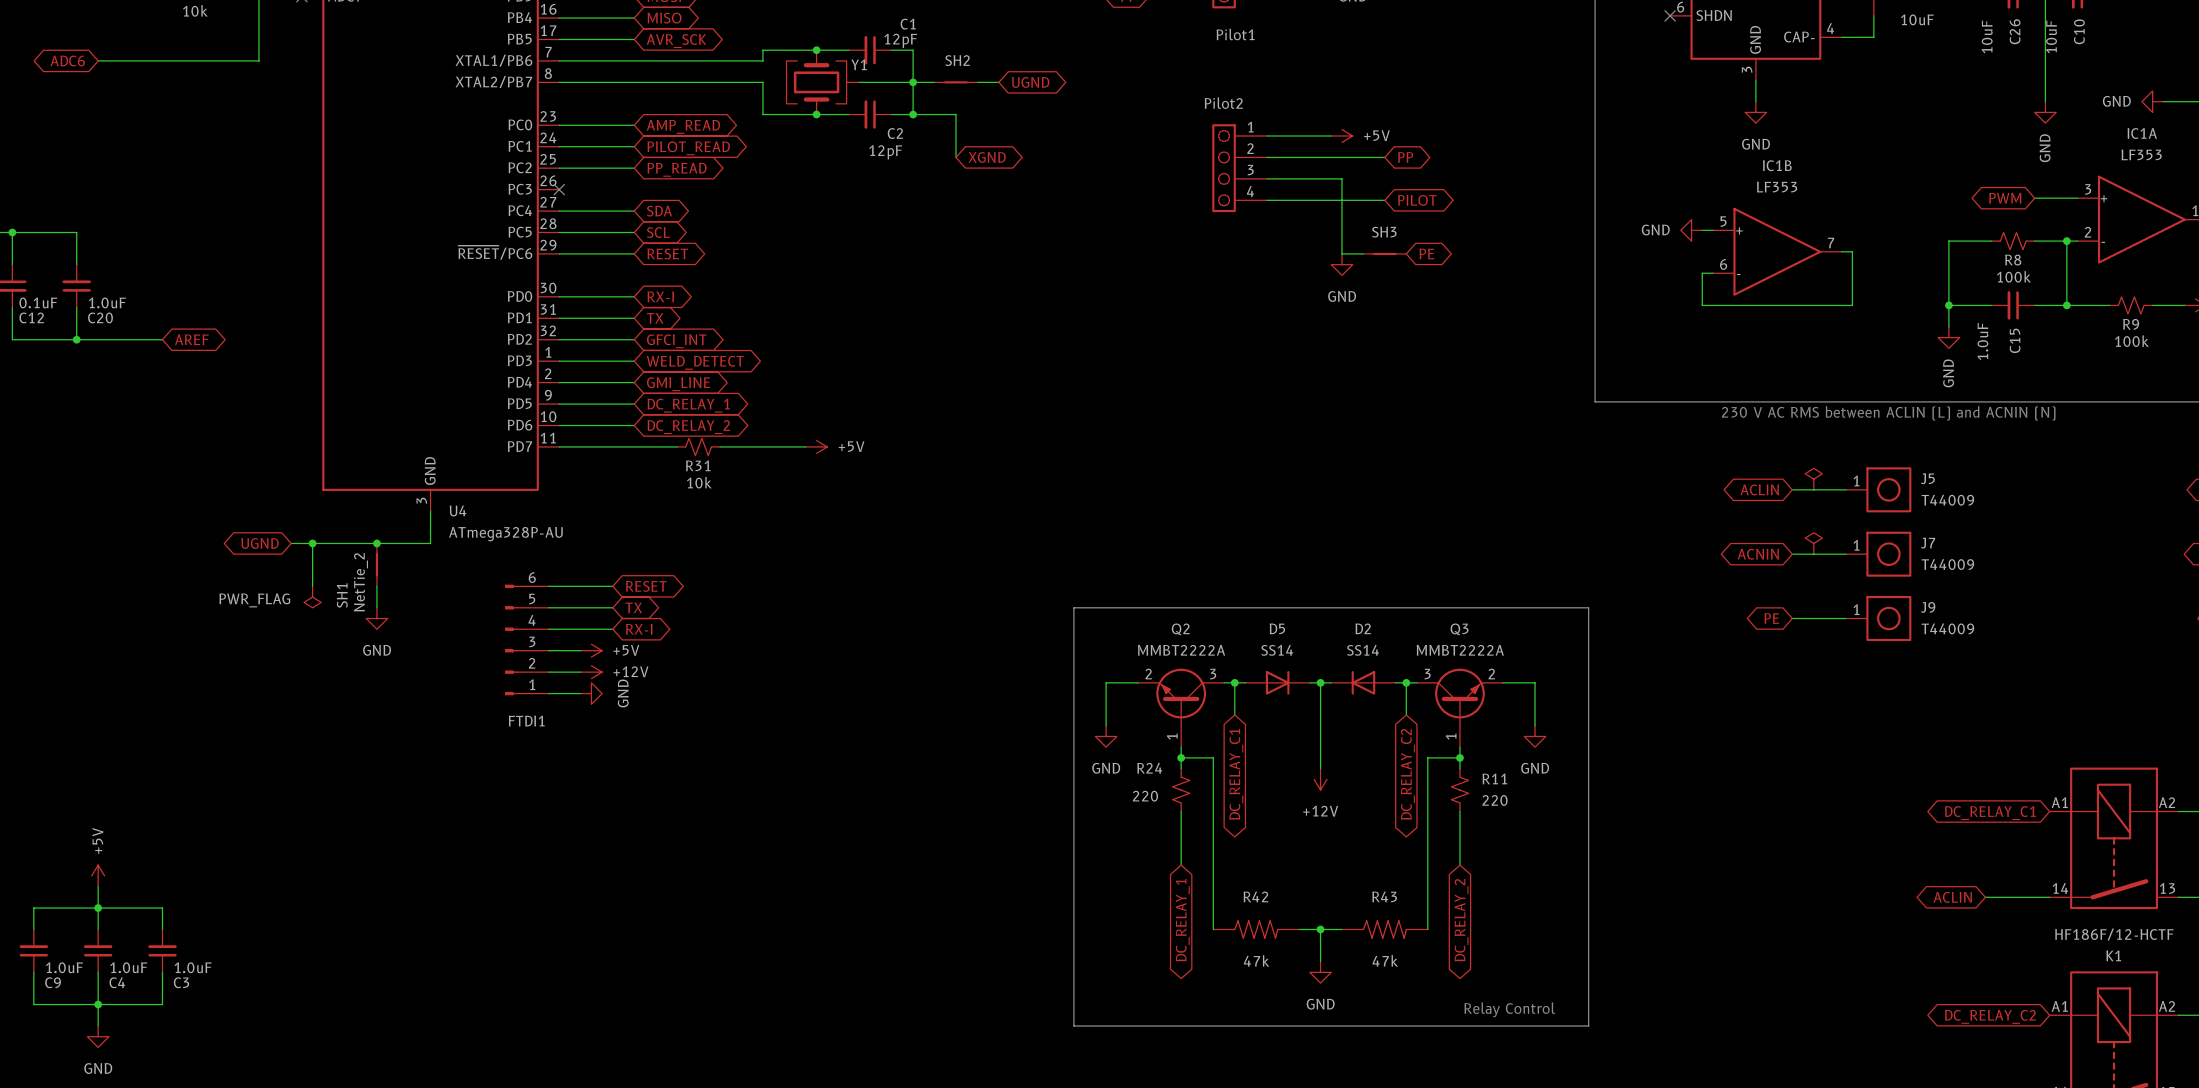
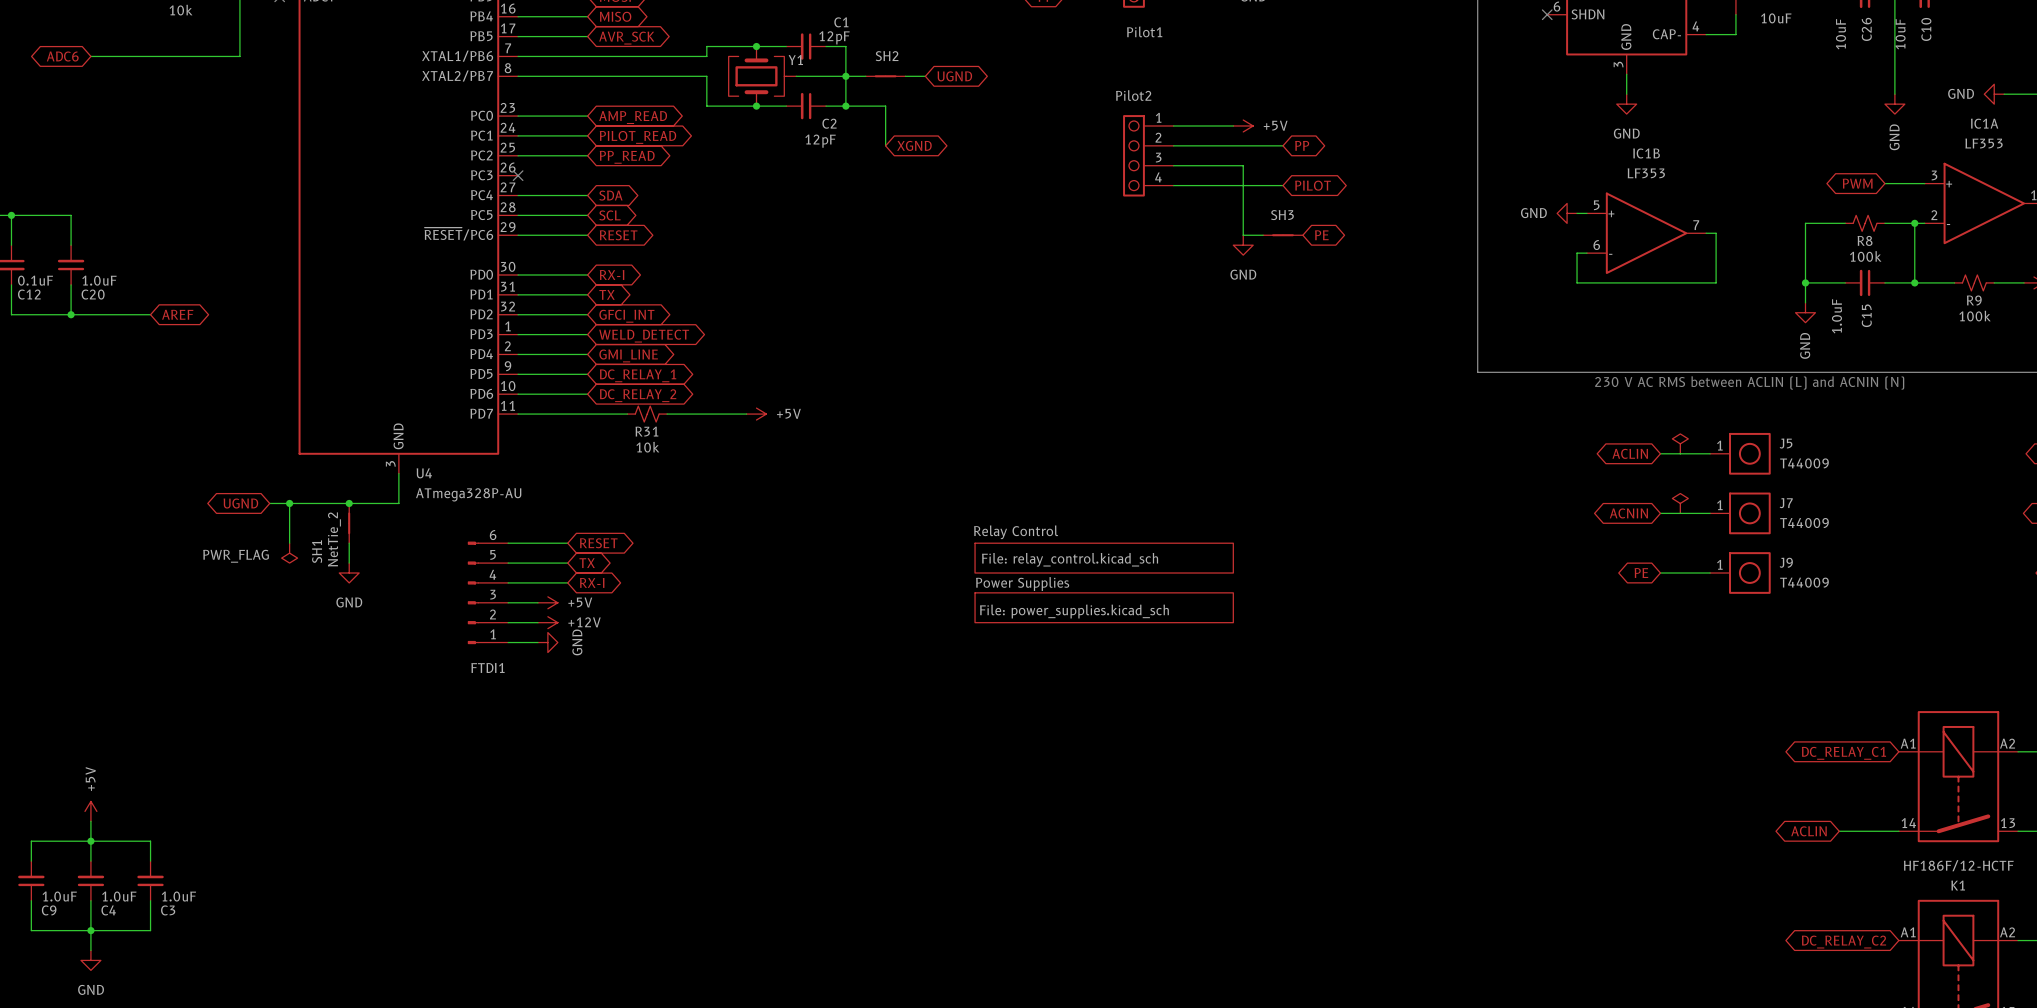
sheet Relay Control: none -> File: relay_control.kicad_sch (1104, 558)
line: (1073, 607) (1588, 607) (1588, 1025) (1073, 1025) (1073, 607) -> none
sheet Power Supplies: none -> File: power_supplies.kicad_sch (1104, 607)
wire: (1138, 682) (1106, 682) (1106, 725) -> none
wire: (1224, 682) (1245, 682) -> none
wire: (1234, 682) (1234, 715) -> none
junction: (1234, 682) -> none
D5: SS14 (1277, 682) -> none
wire: (1309, 682) (1331, 682) -> none
wire: (1320, 682) (1320, 768) -> none
junction: (1320, 682) -> none
D2: SS14 (1363, 682) -> none
wire: (1395, 682) (1417, 682) -> none
wire: (1406, 682) (1406, 715) -> none
junction: (1406, 682) -> none
wire: (1502, 682) (1535, 682) (1535, 725) -> none
Q2: MMBT2222A (1181, 707) -> none
Q3: MMBT2222A (1459, 707) -> none
power symbol: GND (1106, 736) -> none
power symbol: GND (1535, 736) -> none
wire: (1181, 747) (1181, 768) -> none
wire: (1459, 747) (1459, 768) -> none
wire: (1181, 757) (1213, 757) (1213, 929) -> none
junction: (1181, 757) -> none
wire: (1459, 757) (1427, 757) (1427, 929) -> none
junction: (1459, 757) -> none
global label: DC_RELAY_C1 (1236, 774) -> none
global label: DC_RELAY_C2 (1407, 774) -> none
power symbol: +12V (1320, 779) -> none
R24: 220 (1181, 790) -> none
R11: 220 (1459, 790) -> none
wire: (1181, 811) (1181, 865) -> none
wire: (1459, 811) (1459, 865) -> none
global label: DC_RELAY_1 (1182, 920) -> none
global label: DC_RELAY_2 (1461, 920) -> none
R42: 47k (1256, 929) -> none
wire: (1299, 929) (1342, 929) -> none
wire: (1320, 929) (1320, 961) -> none
junction: (1320, 929) -> none
R43: 47k (1384, 929) -> none
power symbol: GND (1320, 972) -> none
text: Relay Control (1509, 1009) -> none

